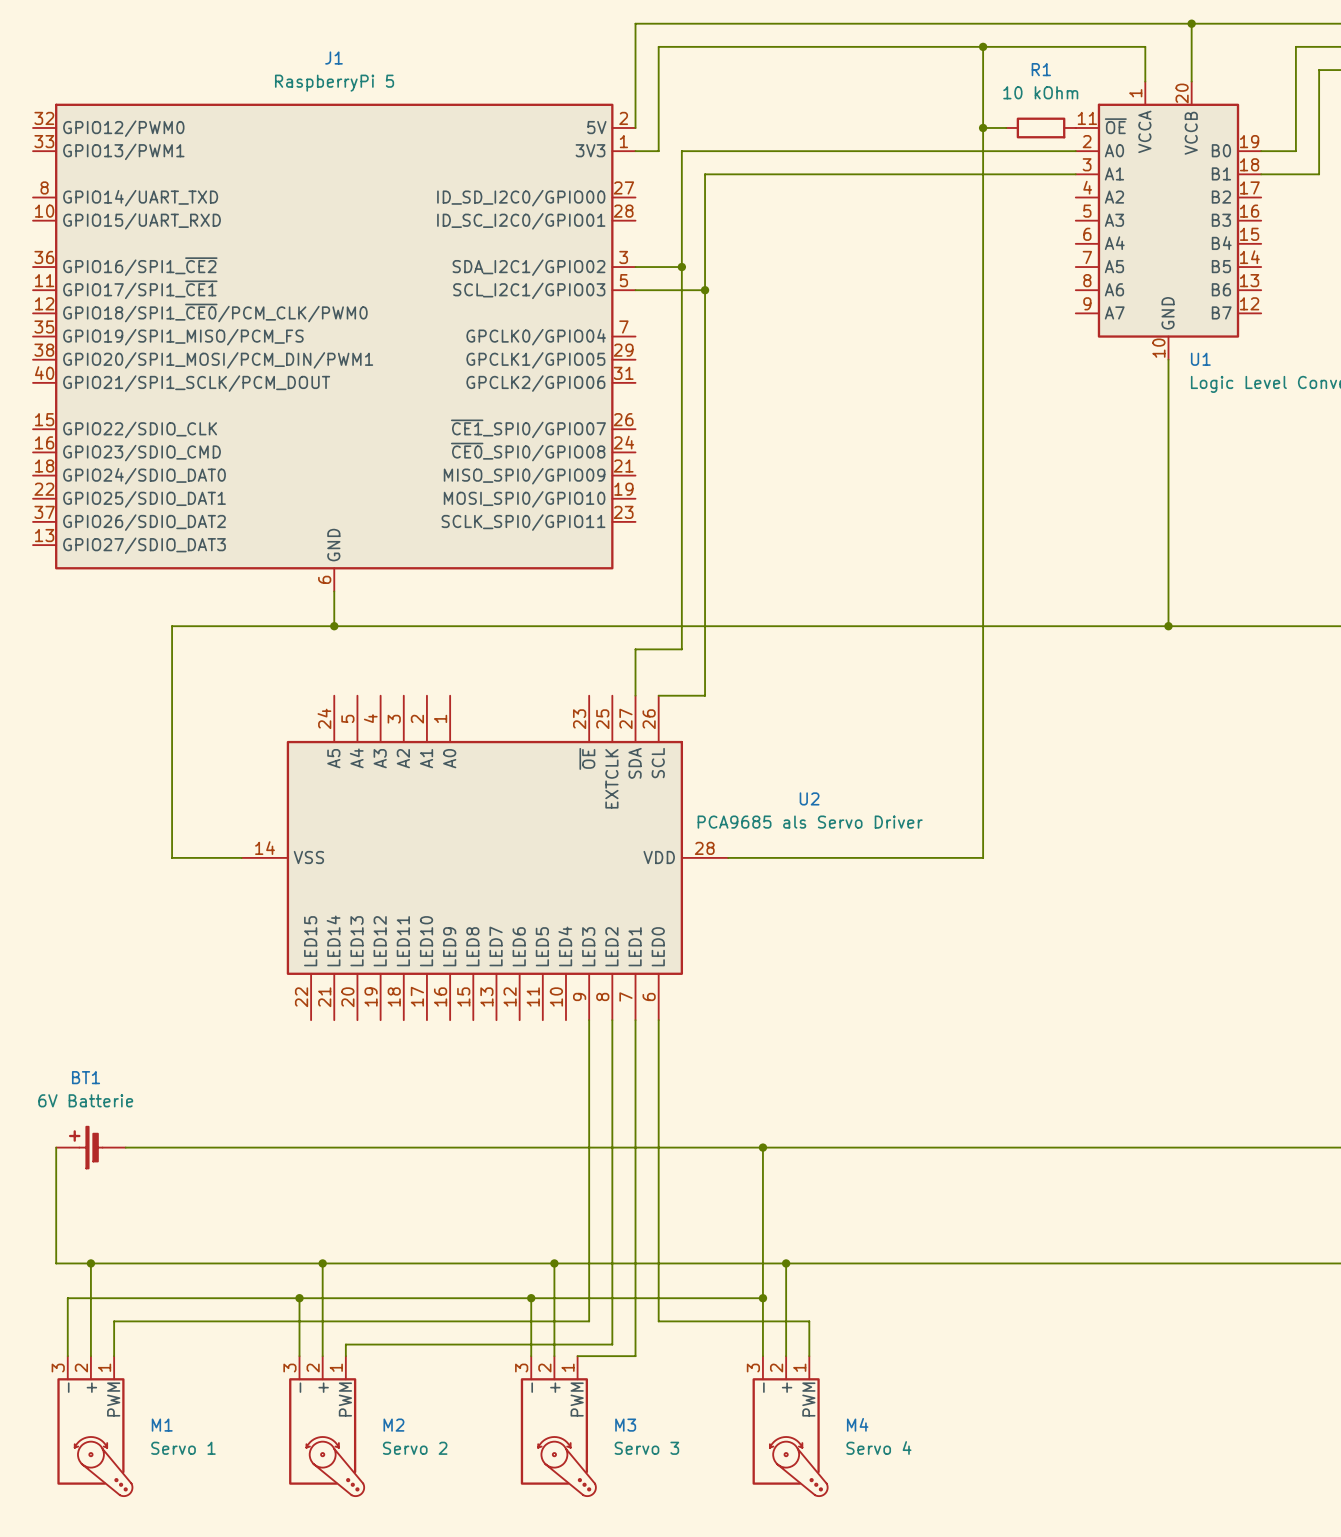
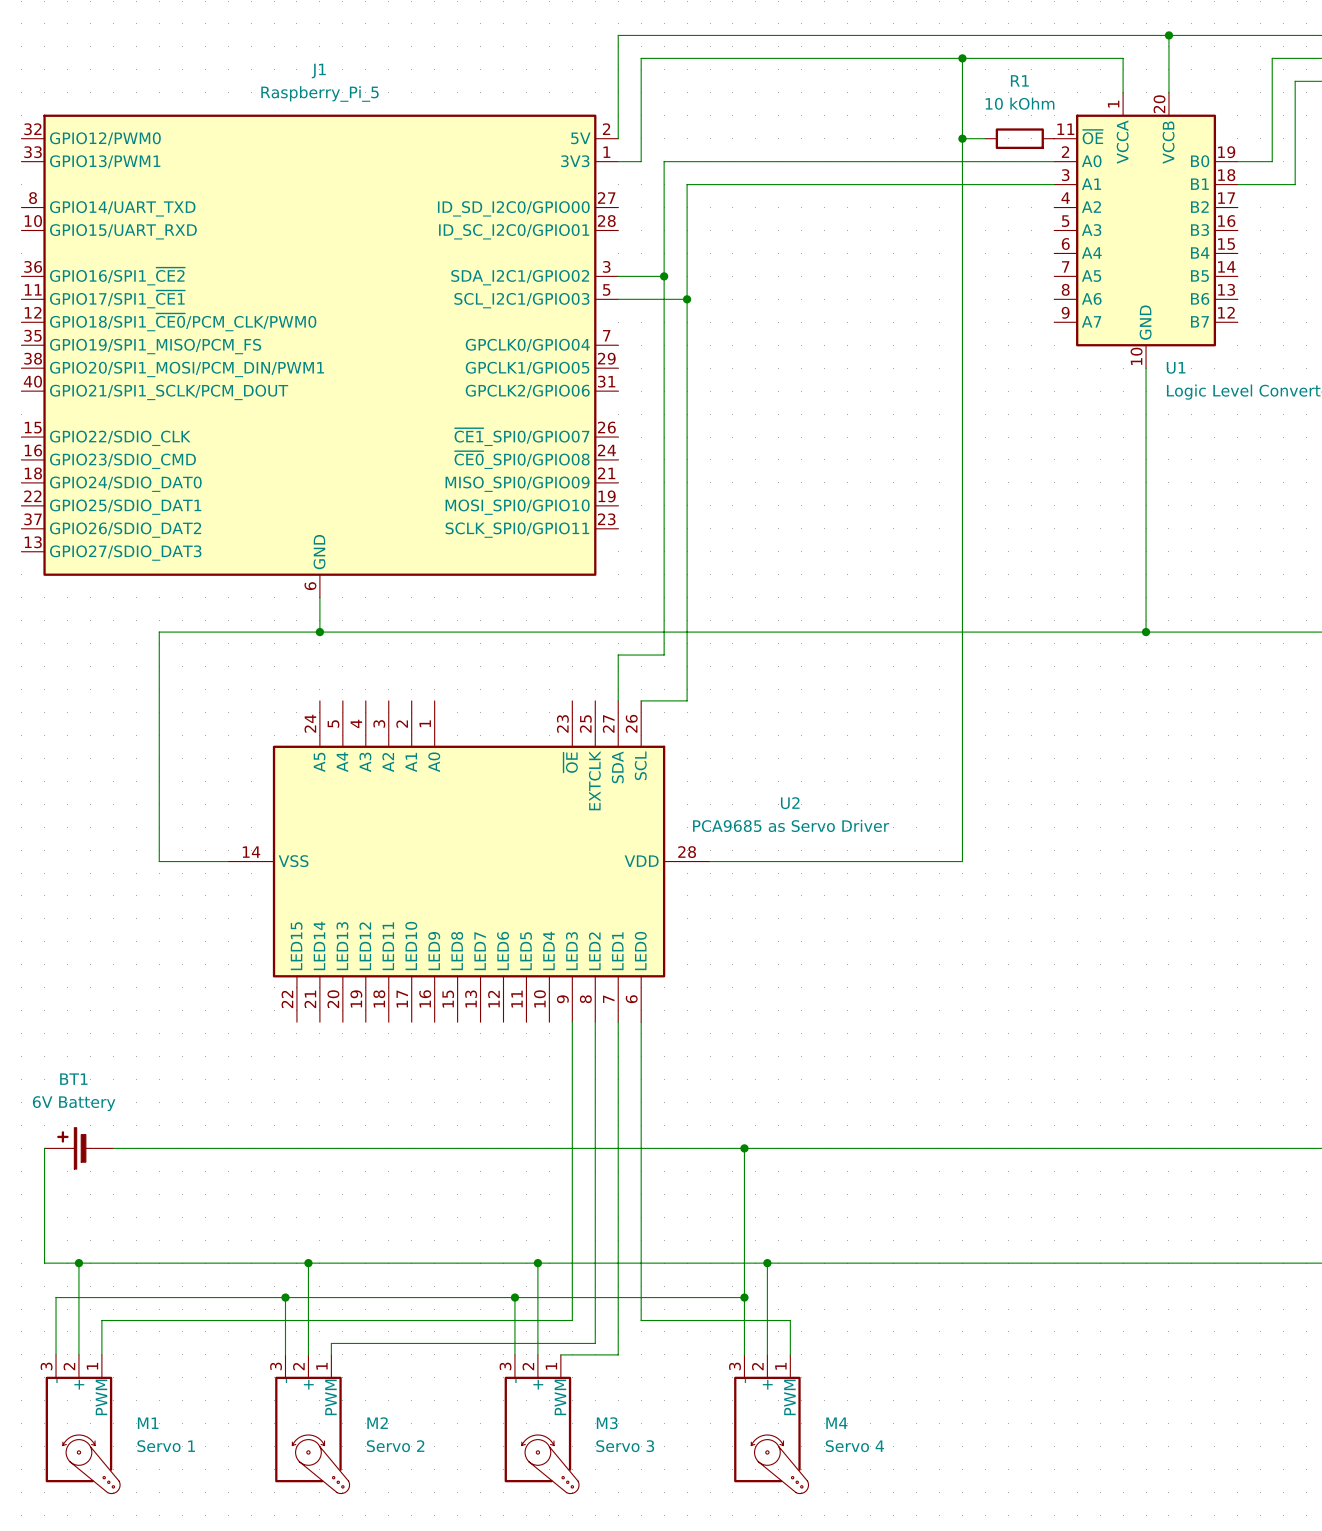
J1 value: RaspberryPi 5 (334, 83) -> Raspberry_Pi_5 (319, 93)
U2 value: PCA9685 als Servo Driver (810, 822) -> PCA9685 as Servo Driver (791, 825)
BT1 value: 6V Batterie (85, 1100) -> 6V Battery (74, 1103)

